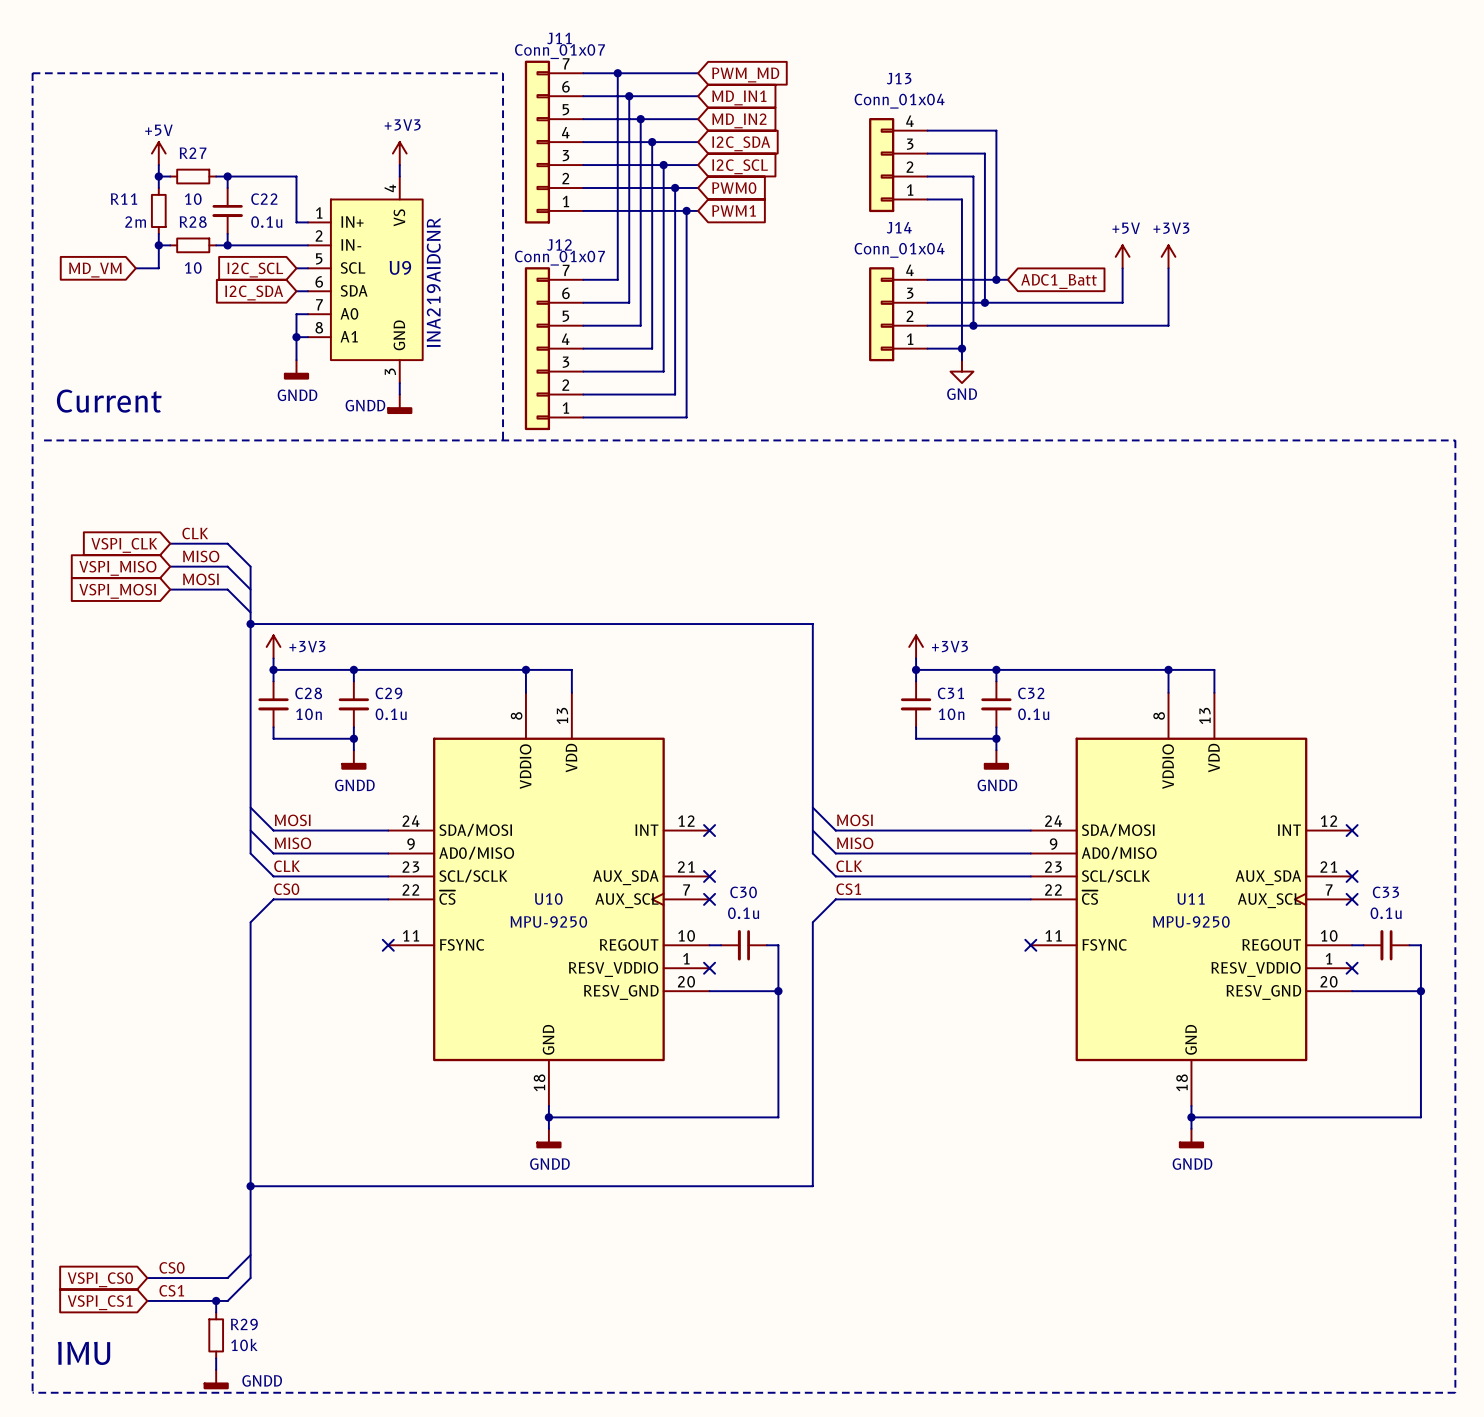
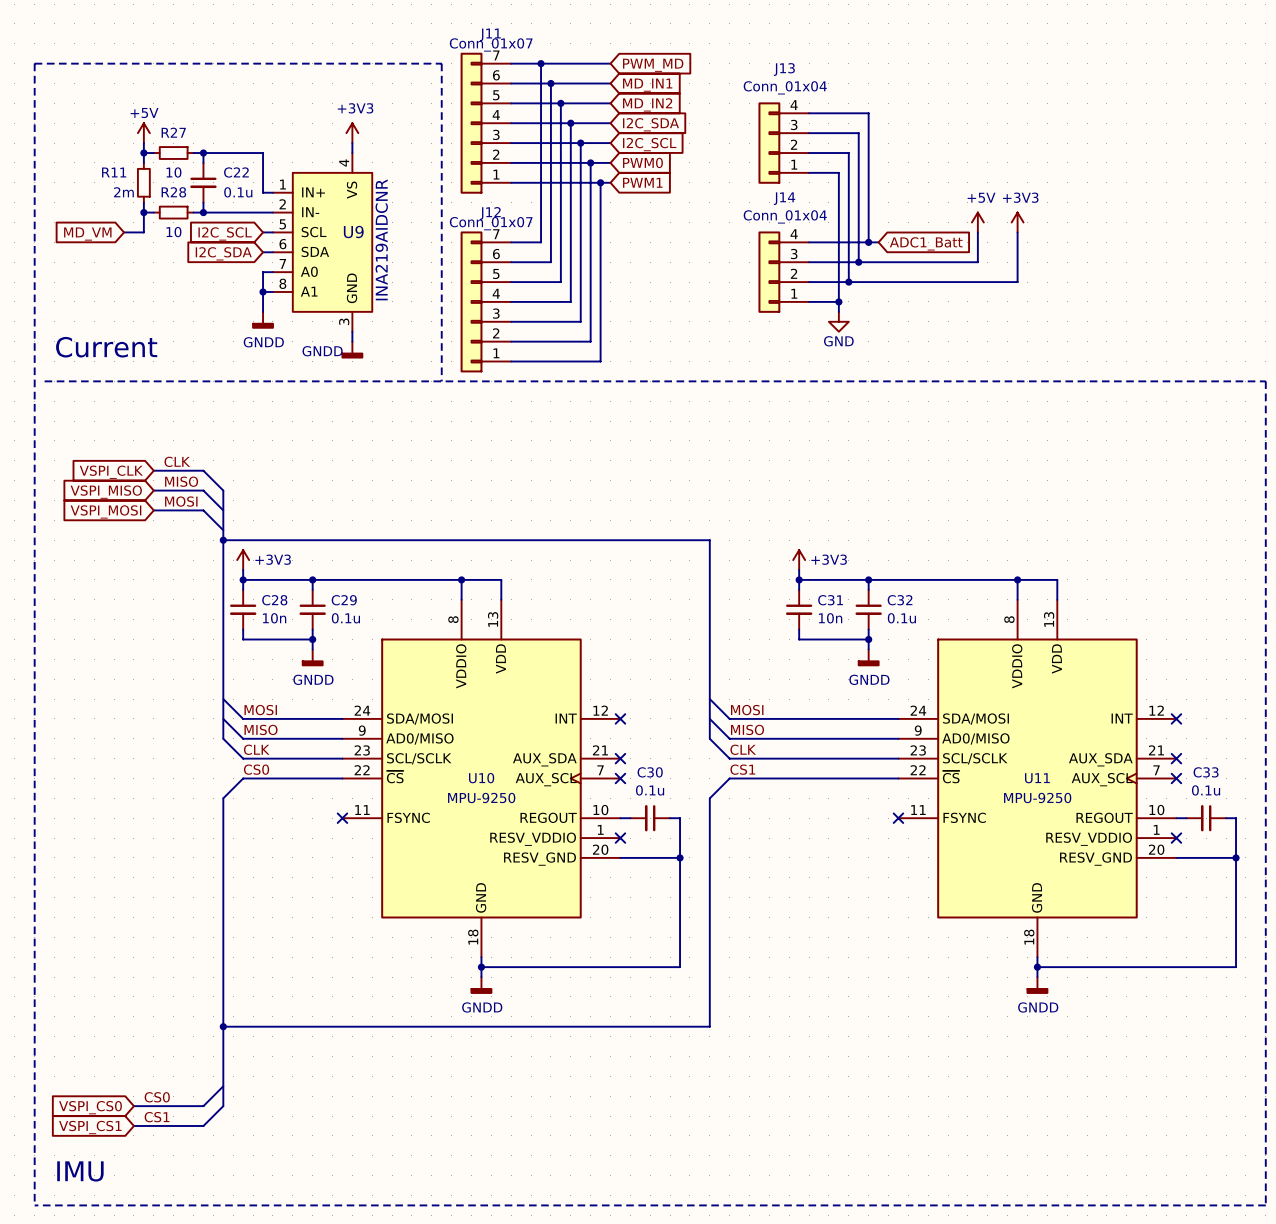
wire: (216, 1300) (216, 1312) -> none
junction: (216, 1300) -> none
R29: 10k (216, 1335) -> none
wire: (216, 1358) (216, 1369) -> none
power symbol: GNDD (216, 1379) -> none

